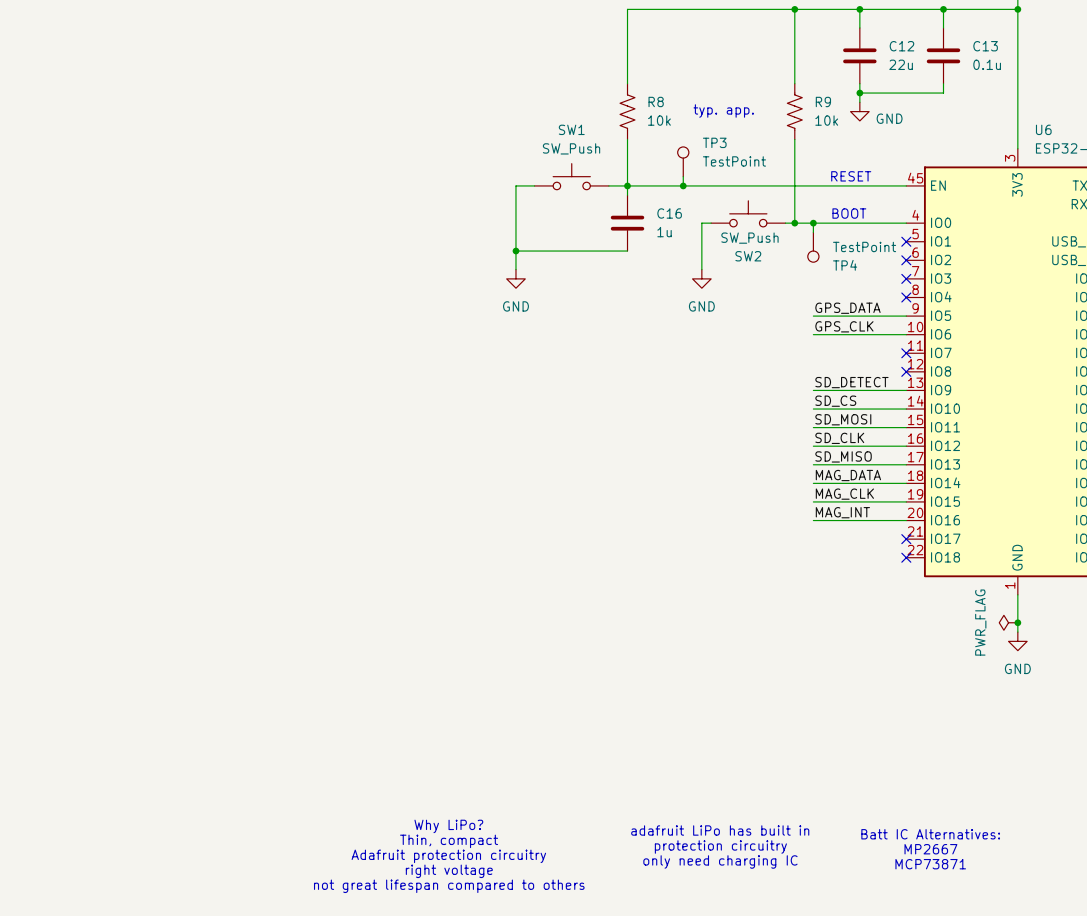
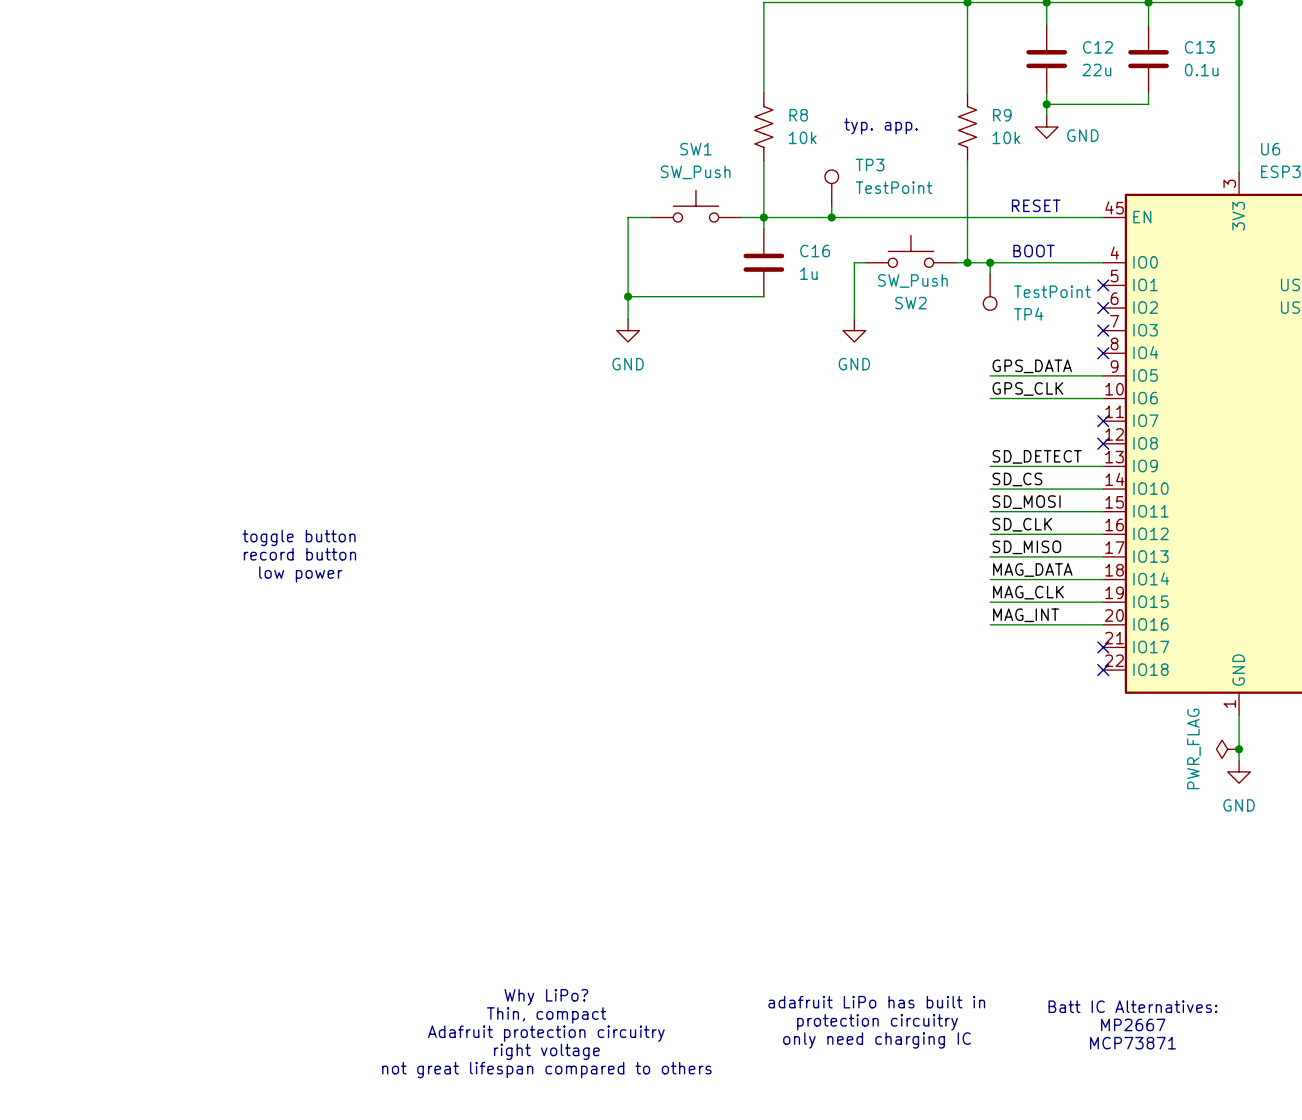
text: none -> toggle button (299, 537)
text: none -> record button (299, 554)
text: none -> low power (300, 574)

